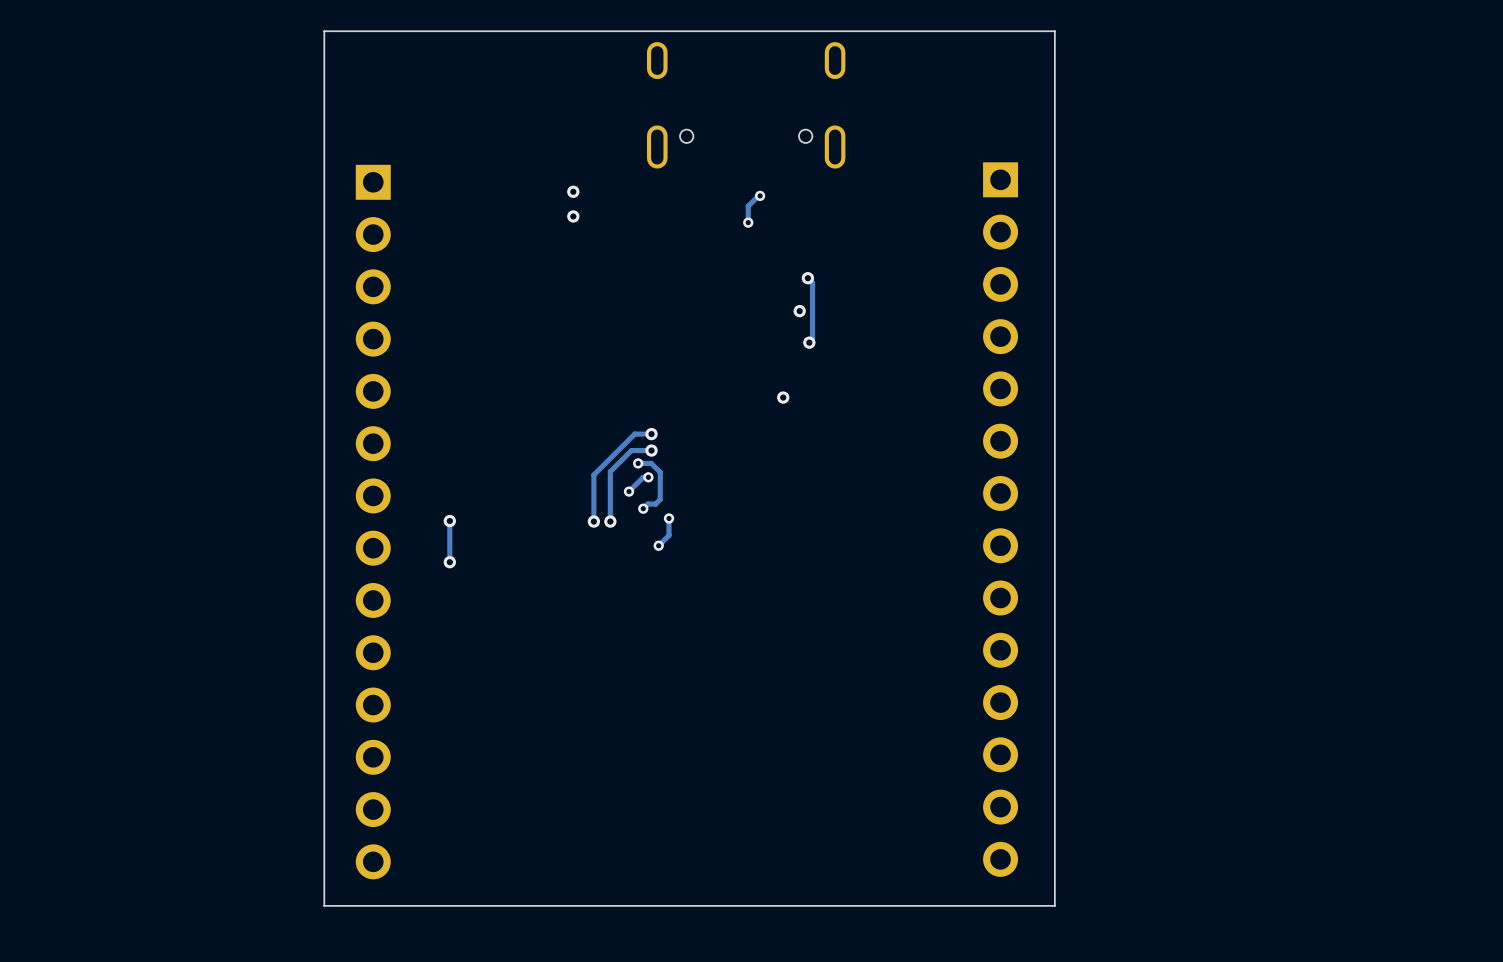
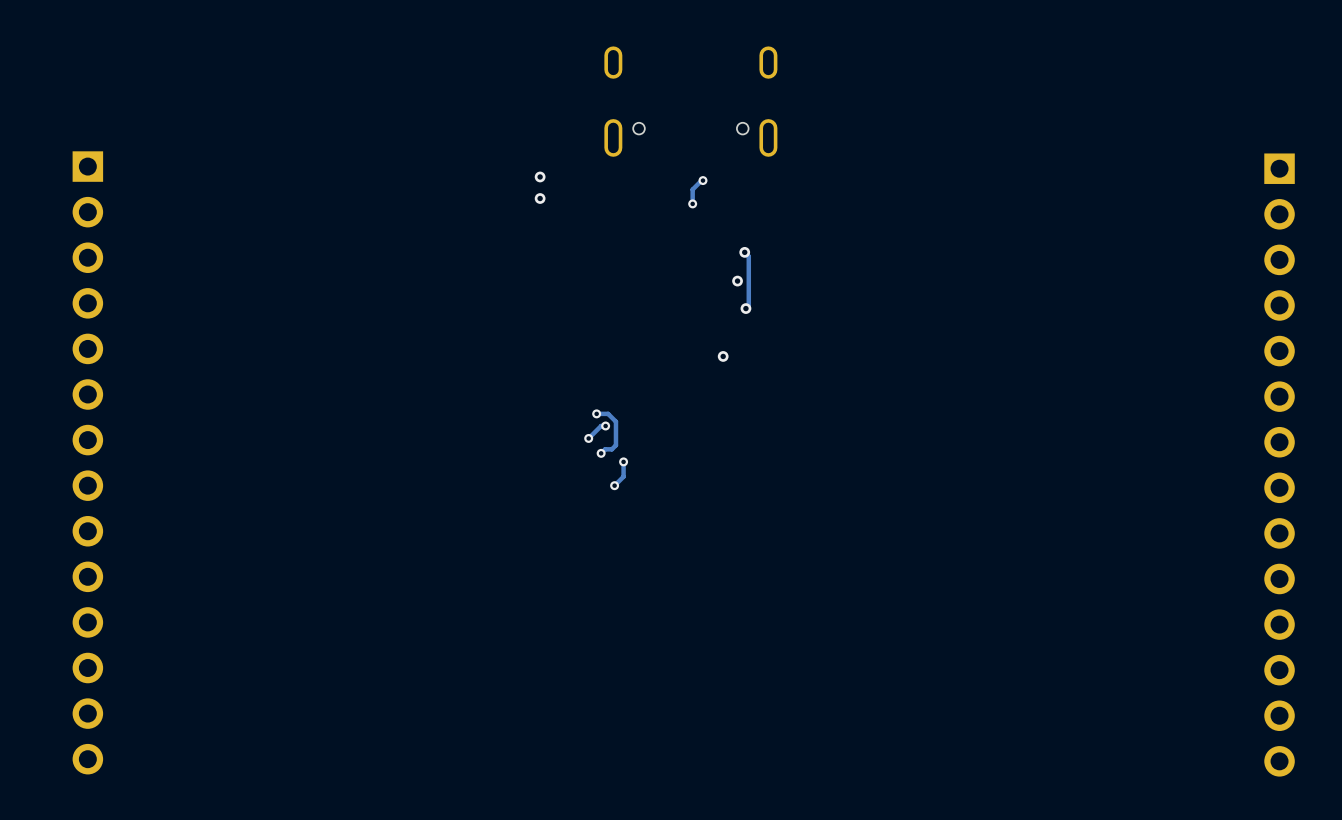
board edge: (1054, 31) (324, 31) (324, 905) (1054, 905) (1054, 31) -> none
track: (651, 434) (634, 434) (593, 474) (593, 521) -> none
via: (651, 434) -> none
track: (651, 450) (631, 450) (610, 471) (610, 521) -> none
via: (651, 450) -> none
part position: (1000, 519) -> (1279, 465)
track: (449, 521) (449, 562) -> none
via: (449, 521) -> none
via: (593, 521) -> none
via: (610, 521) -> none
part position: (373, 522) -> (87, 462)
via: (449, 562) -> none

